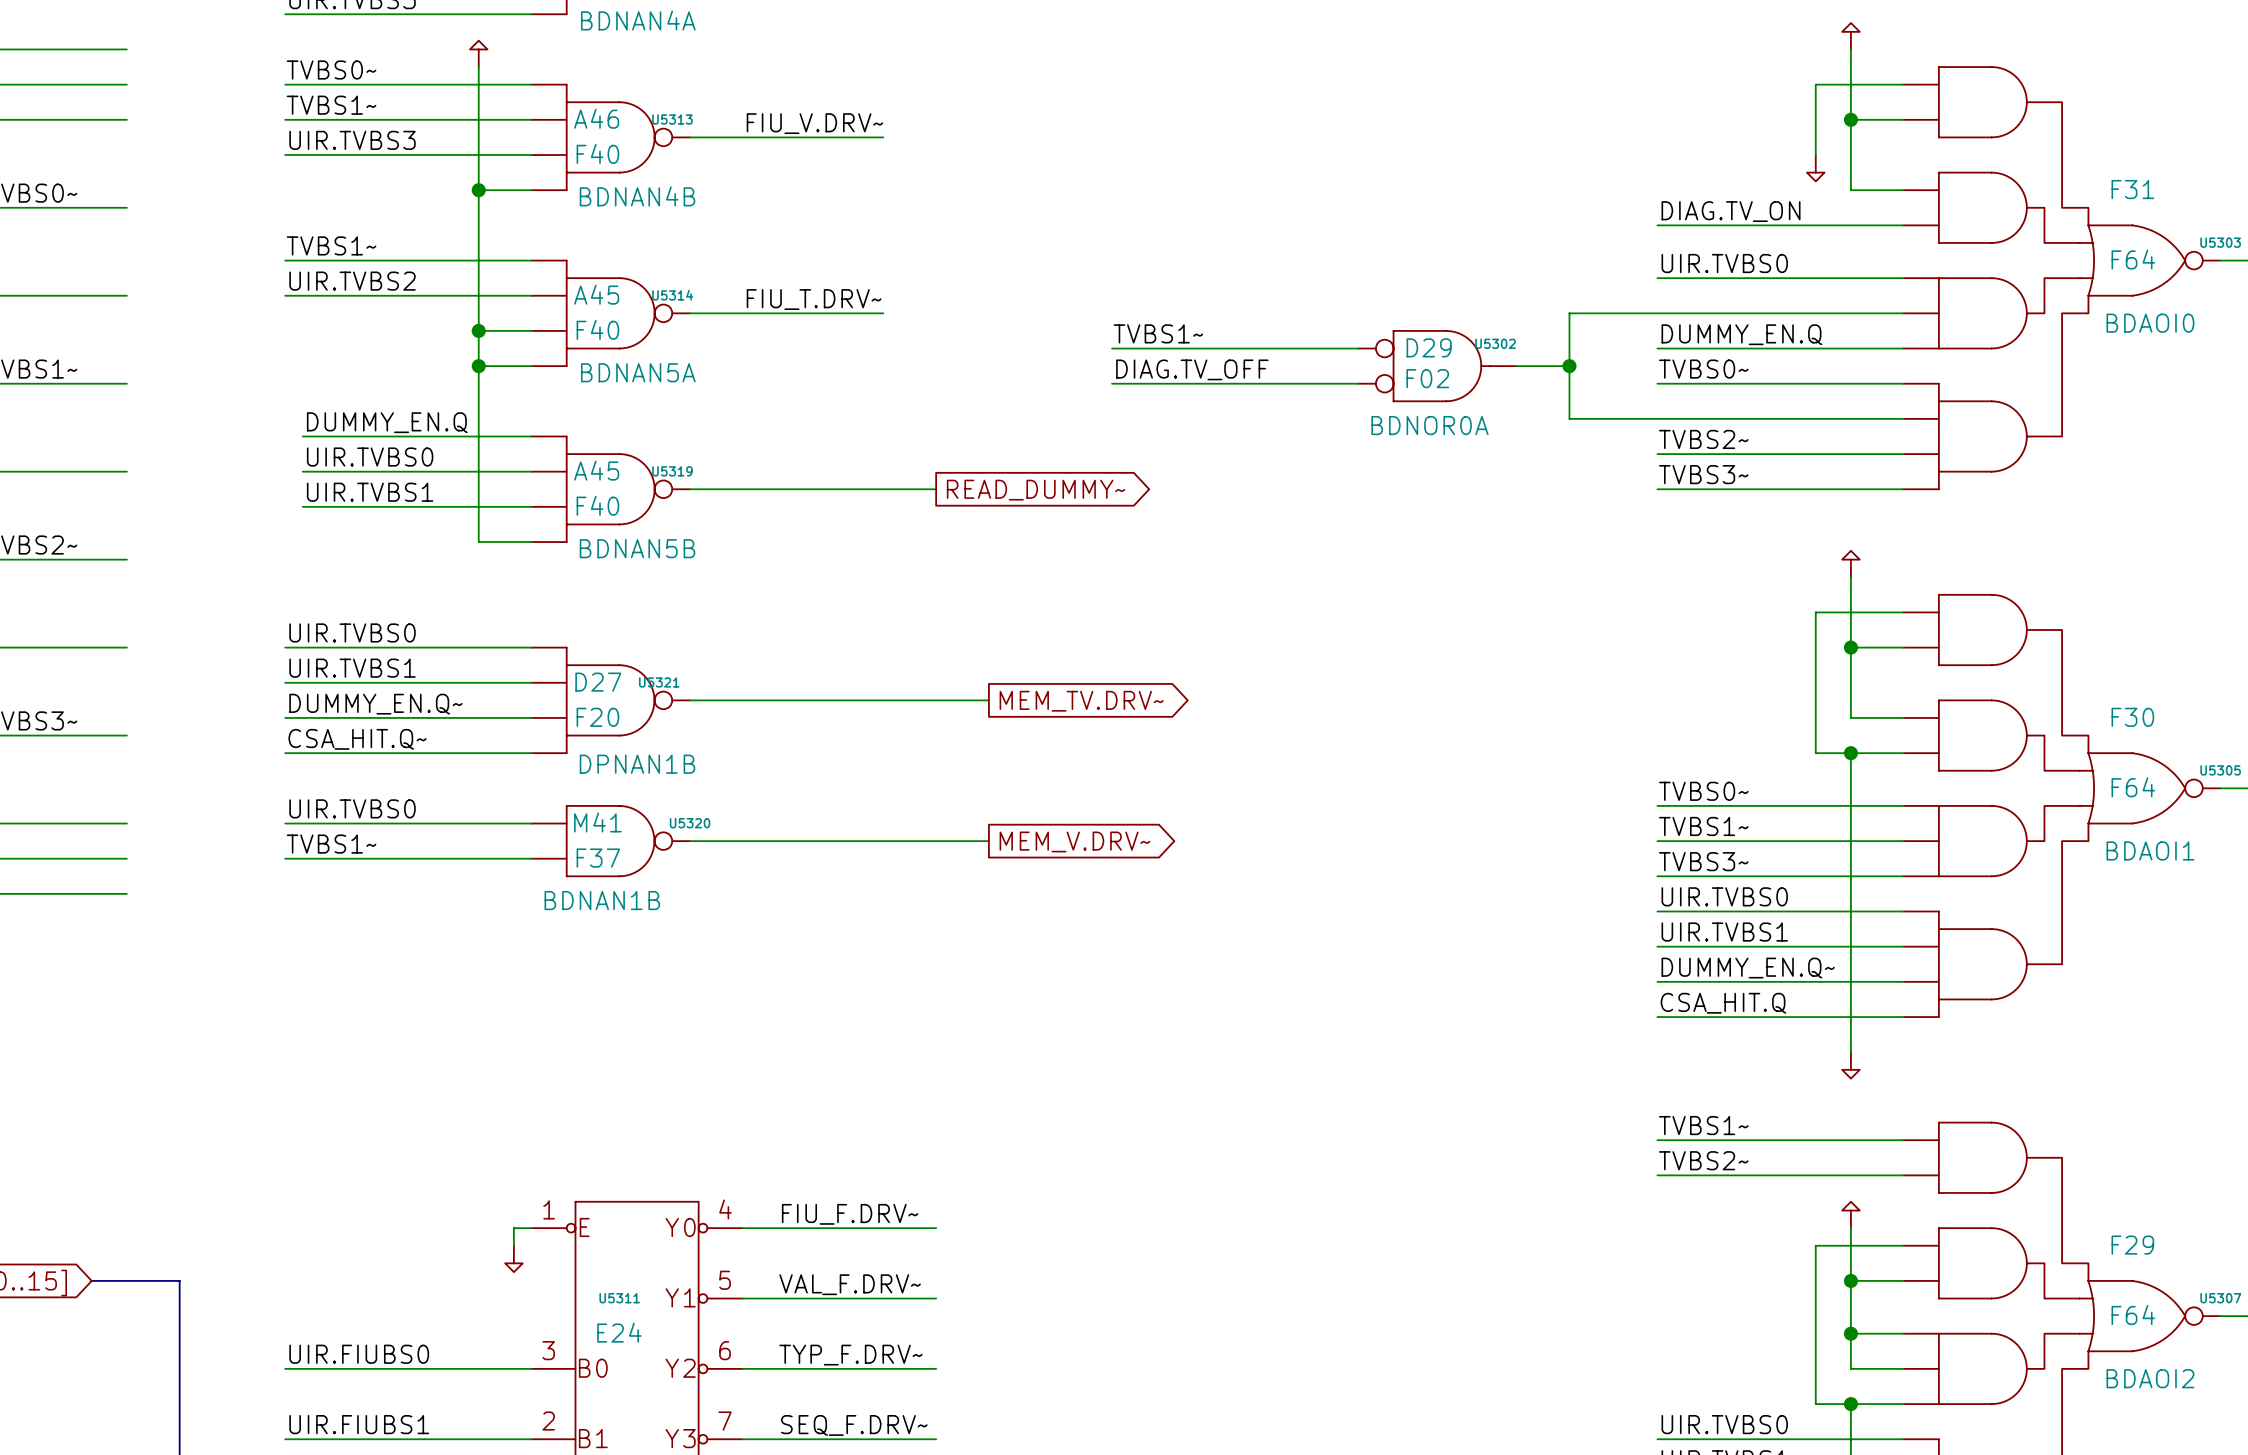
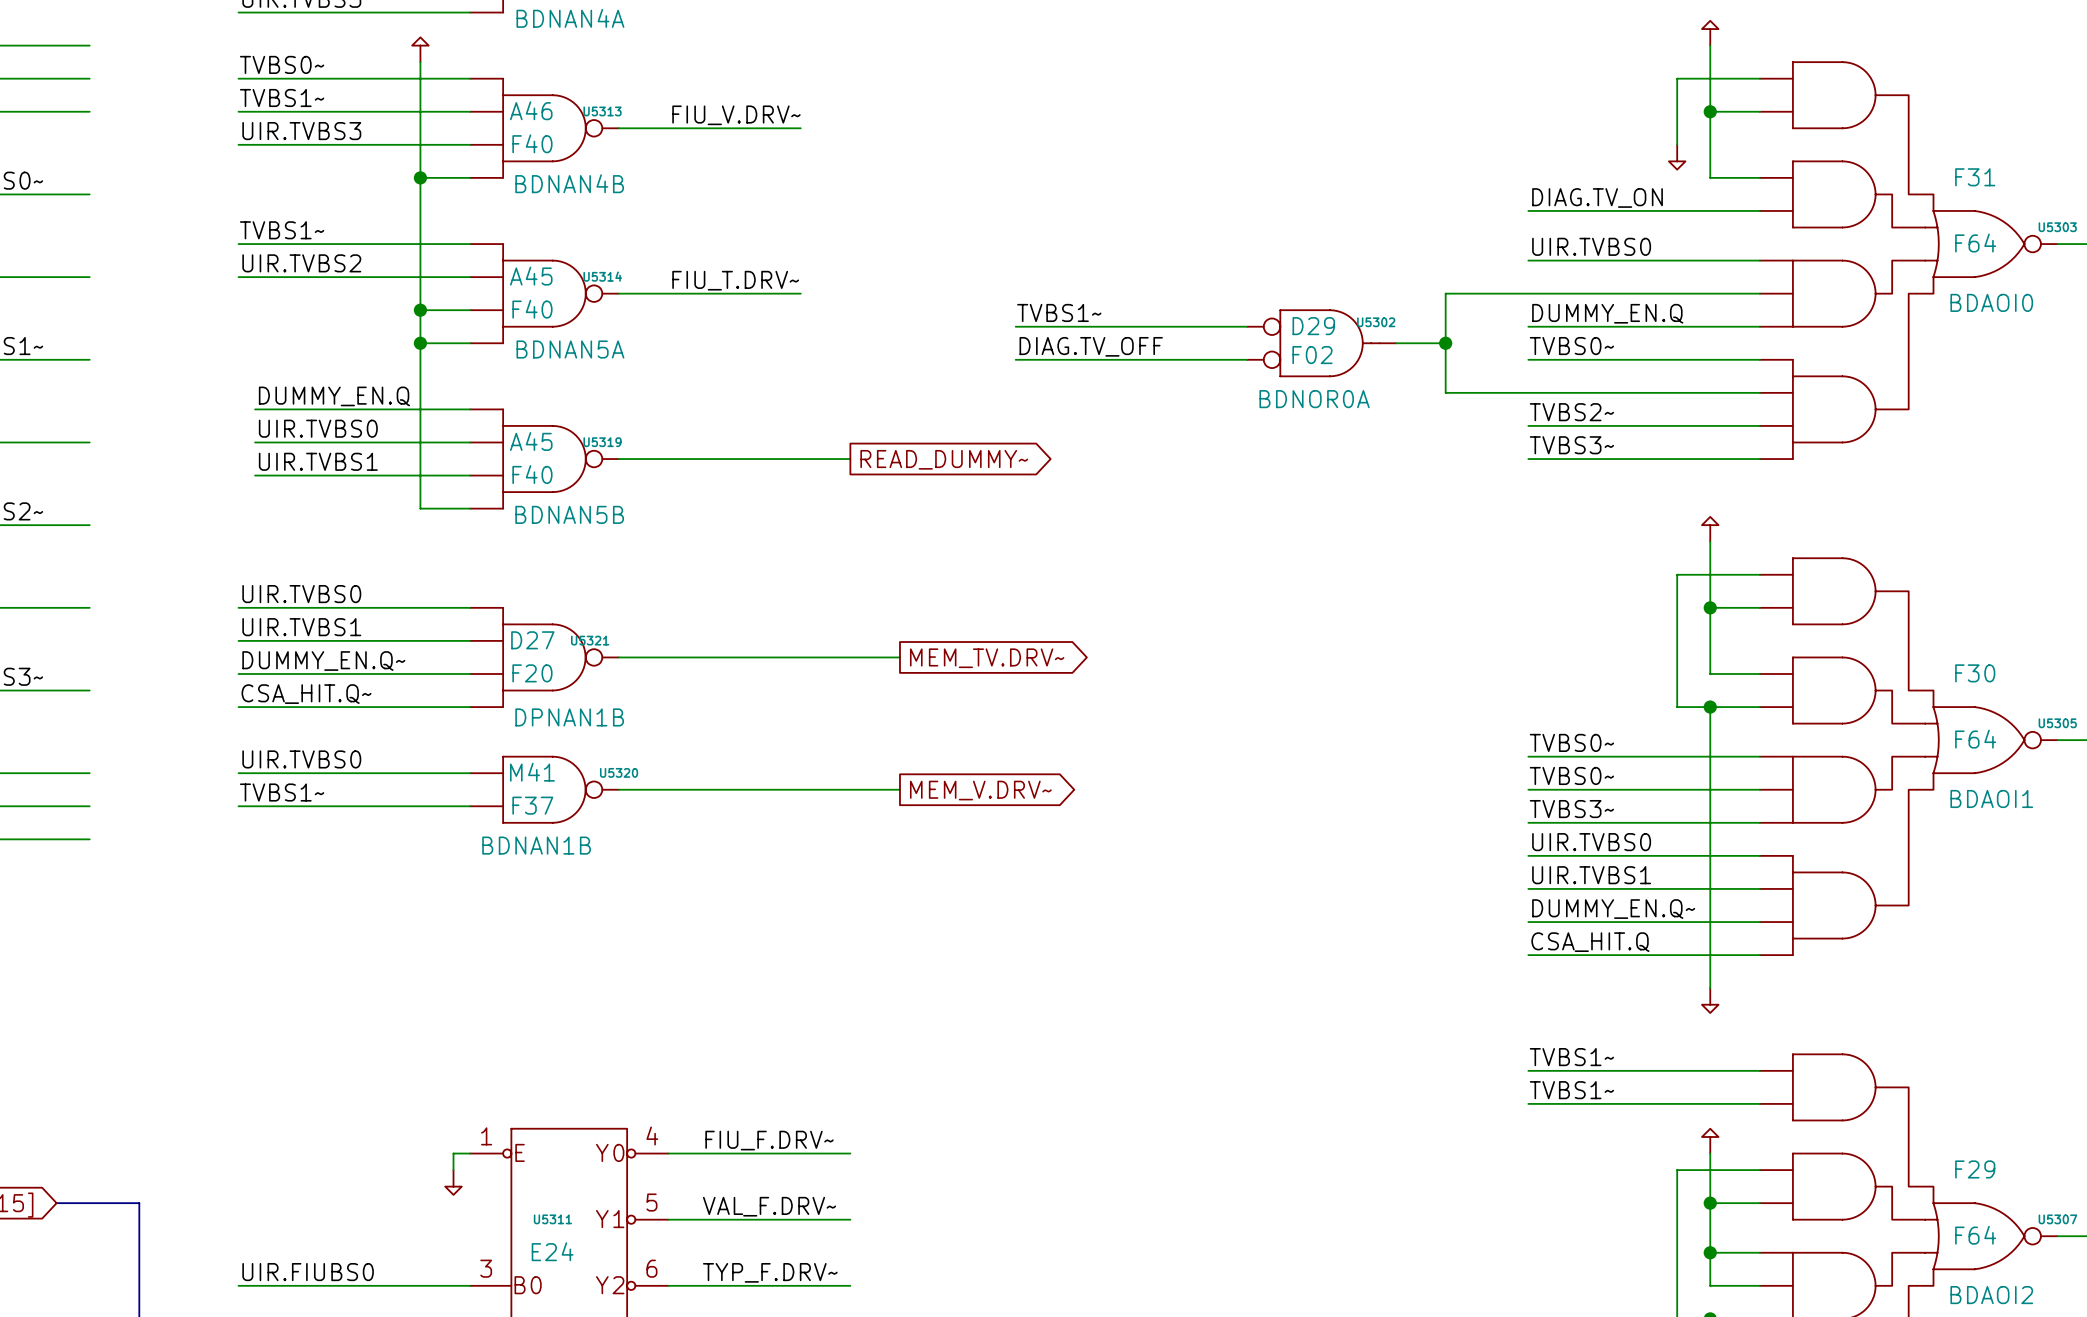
label: TVBS1~ (1703, 826) -> TVBS0~ (1571, 775)
label: TVBS2~ (1703, 1160) -> TVBS1~ (1571, 1090)

